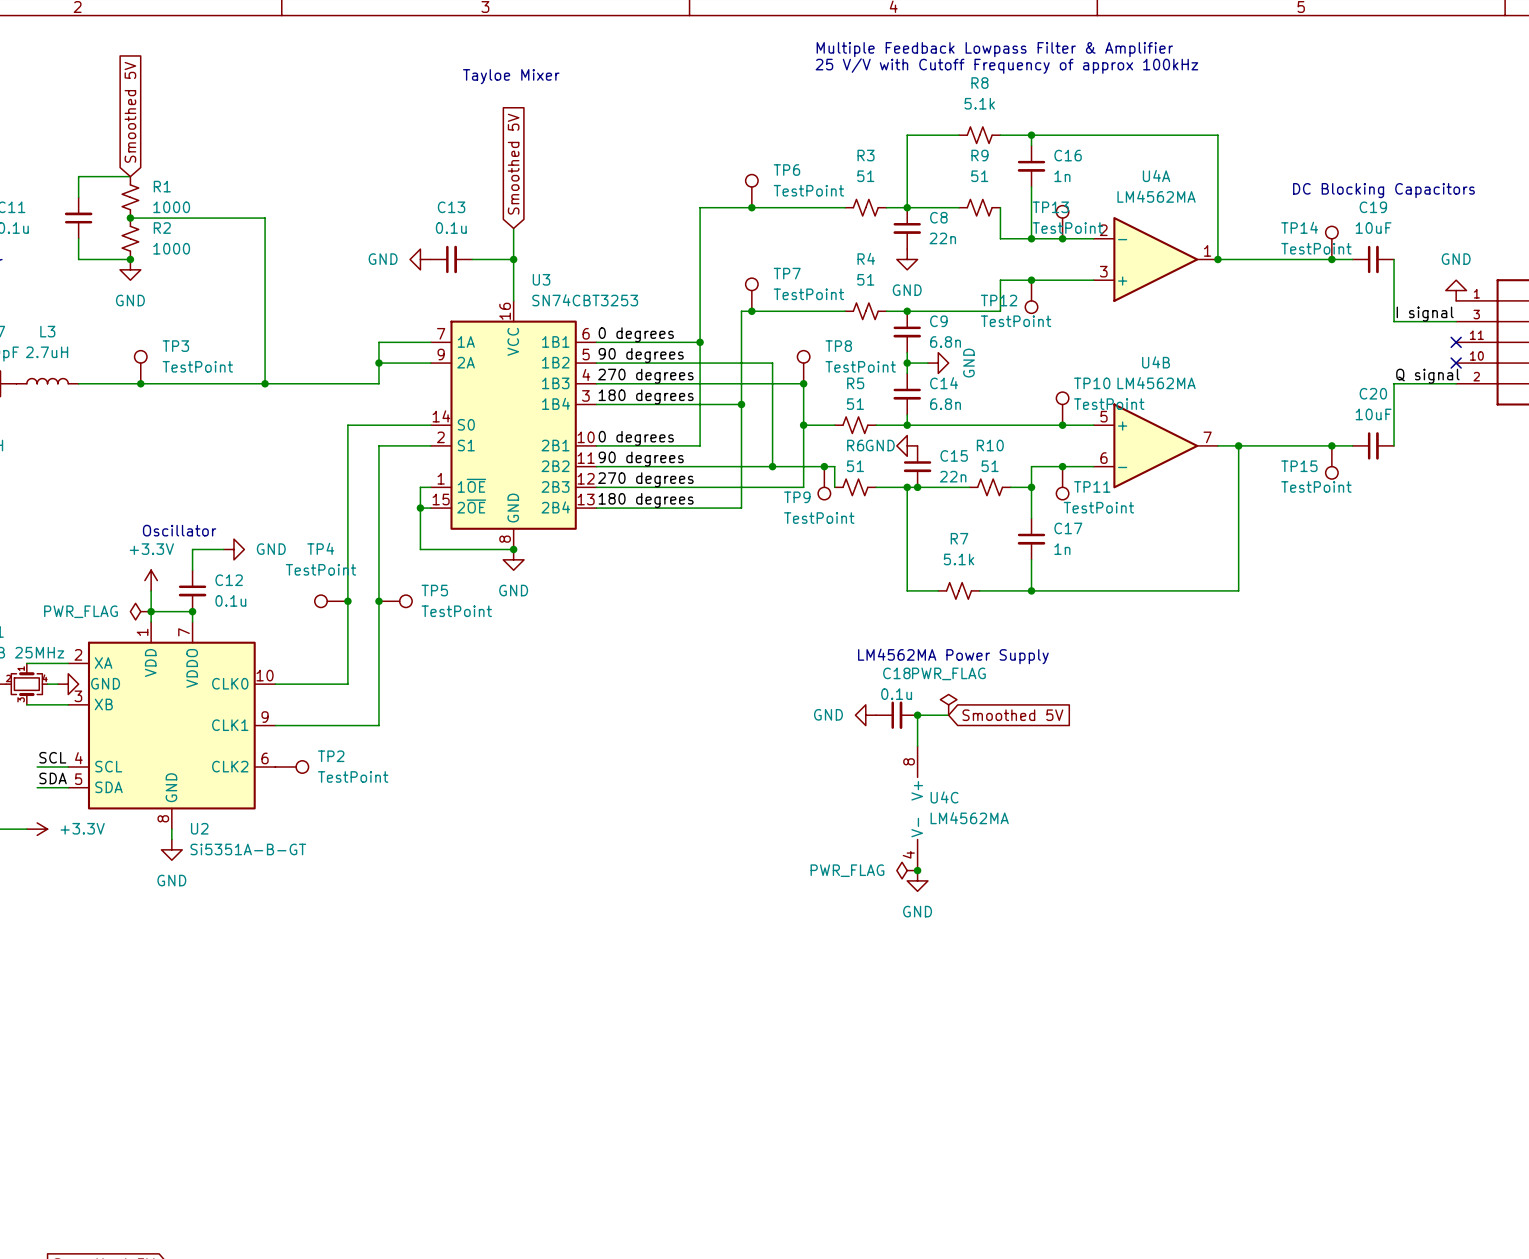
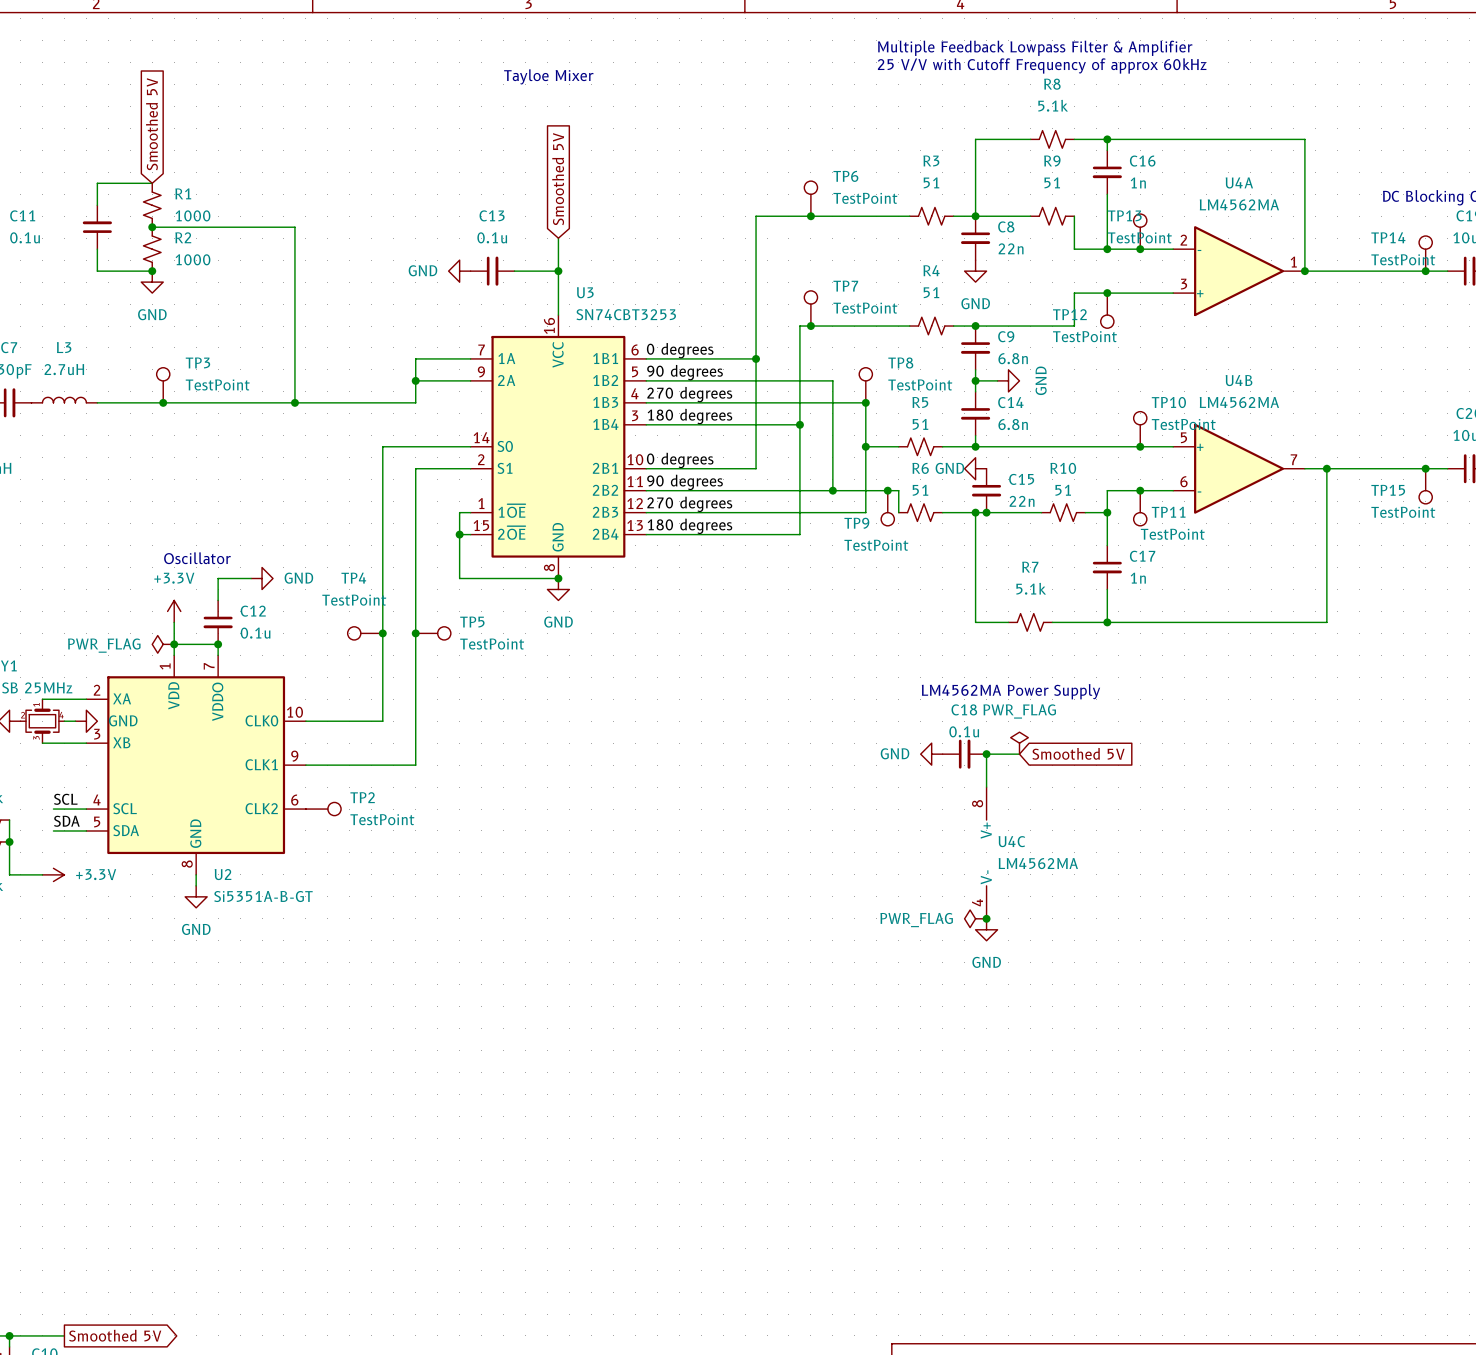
text: 25 V/V with Cutoff Frequency of approx 100kHz (1006, 66) -> 25 V/V with Cutoff Frequency of approx 60kHz (1042, 65)

